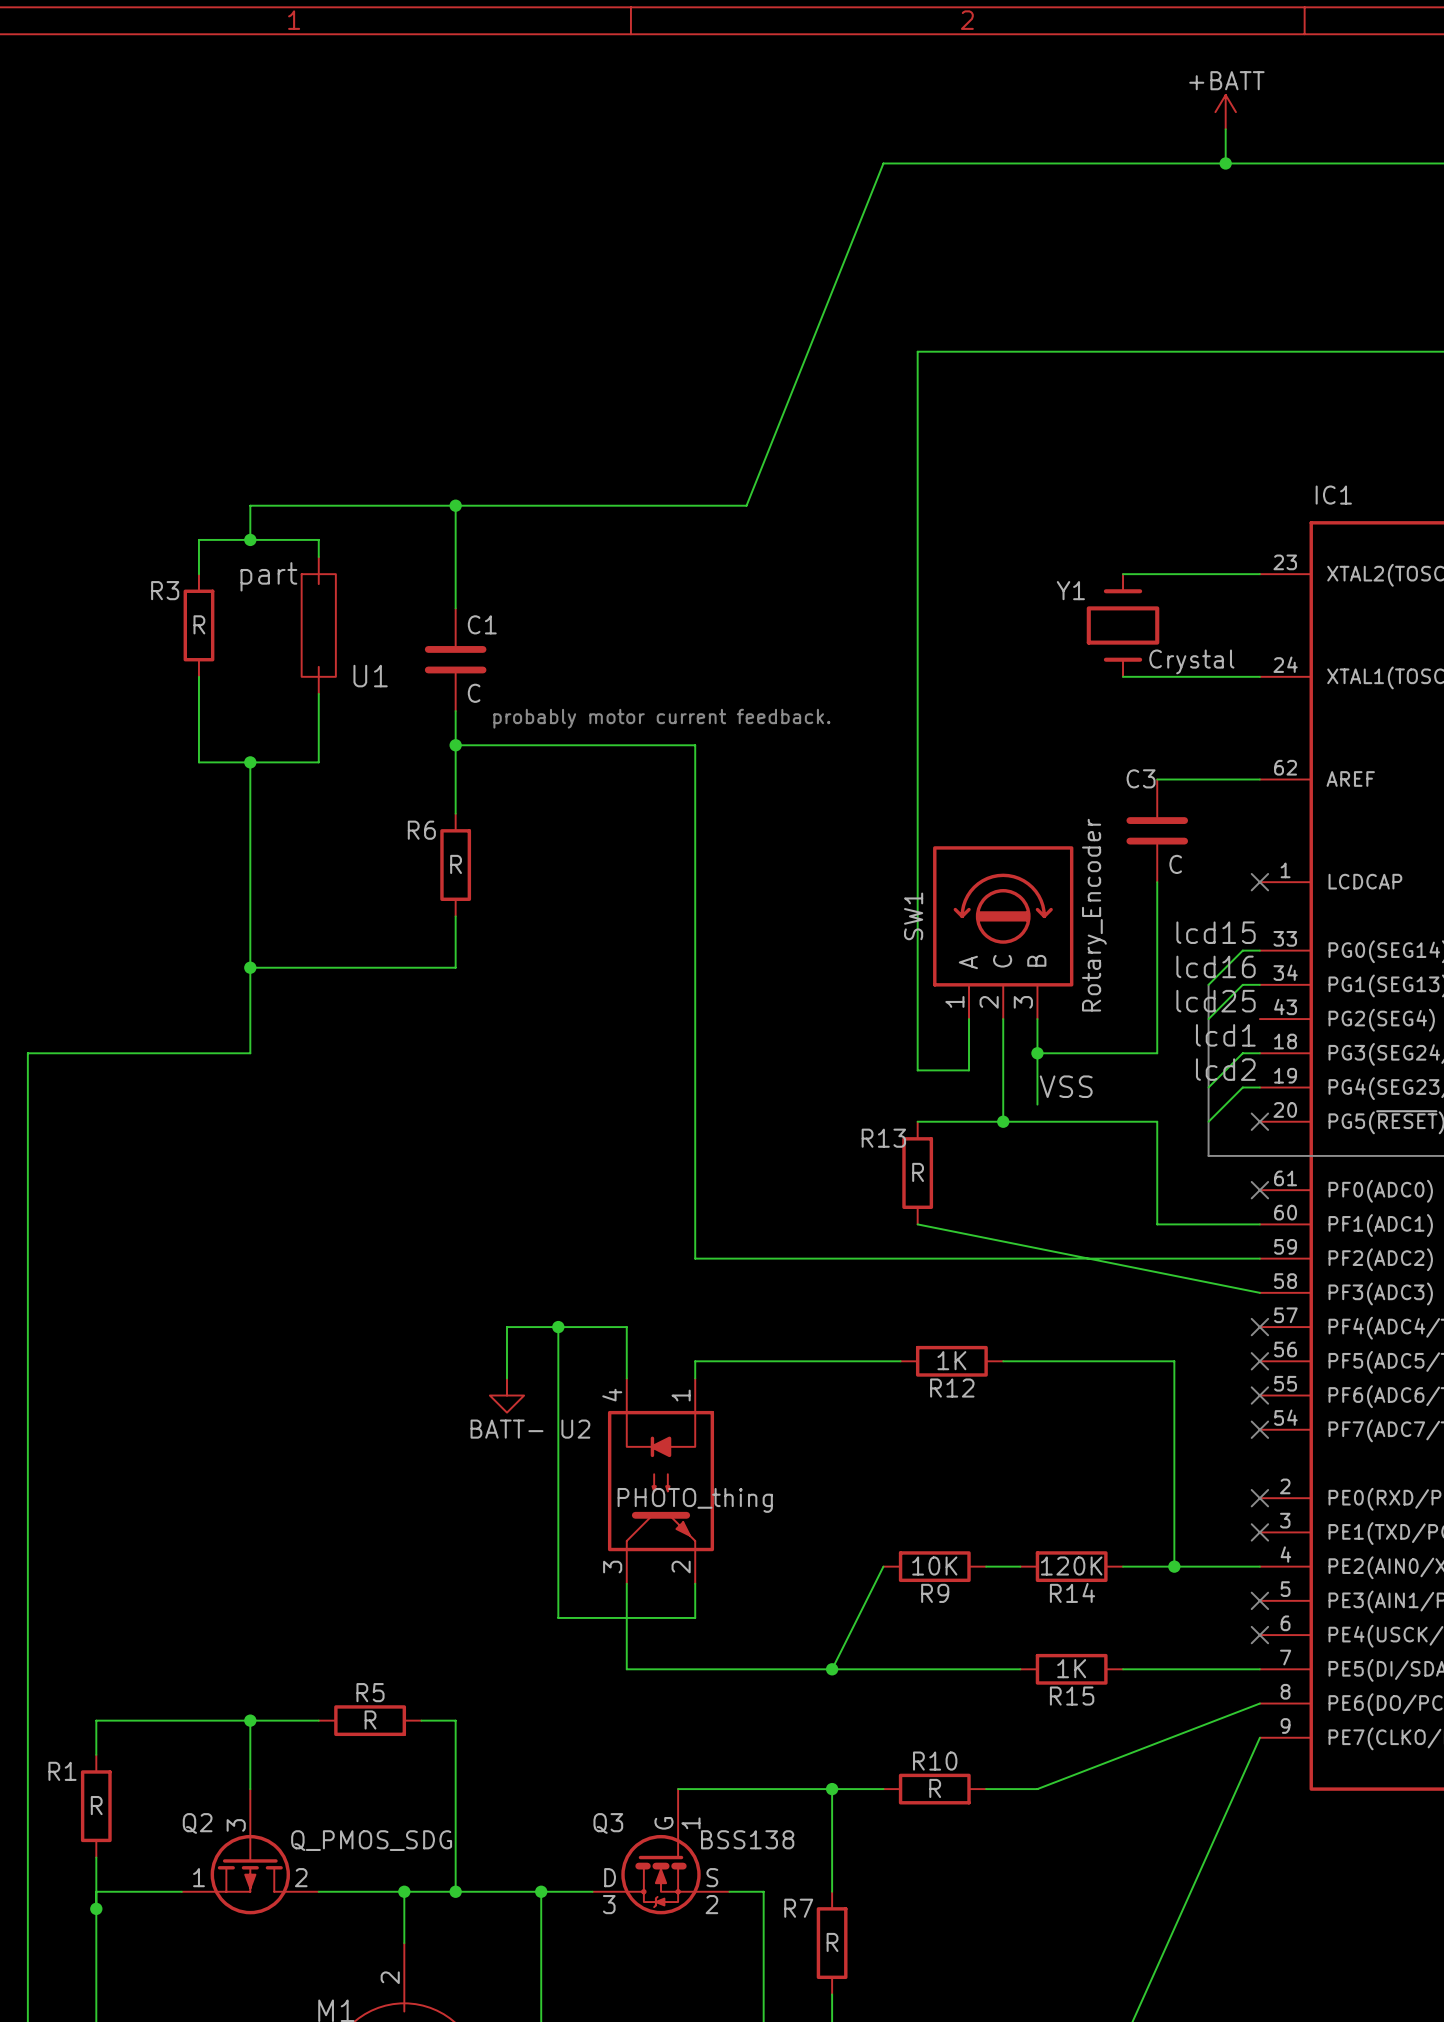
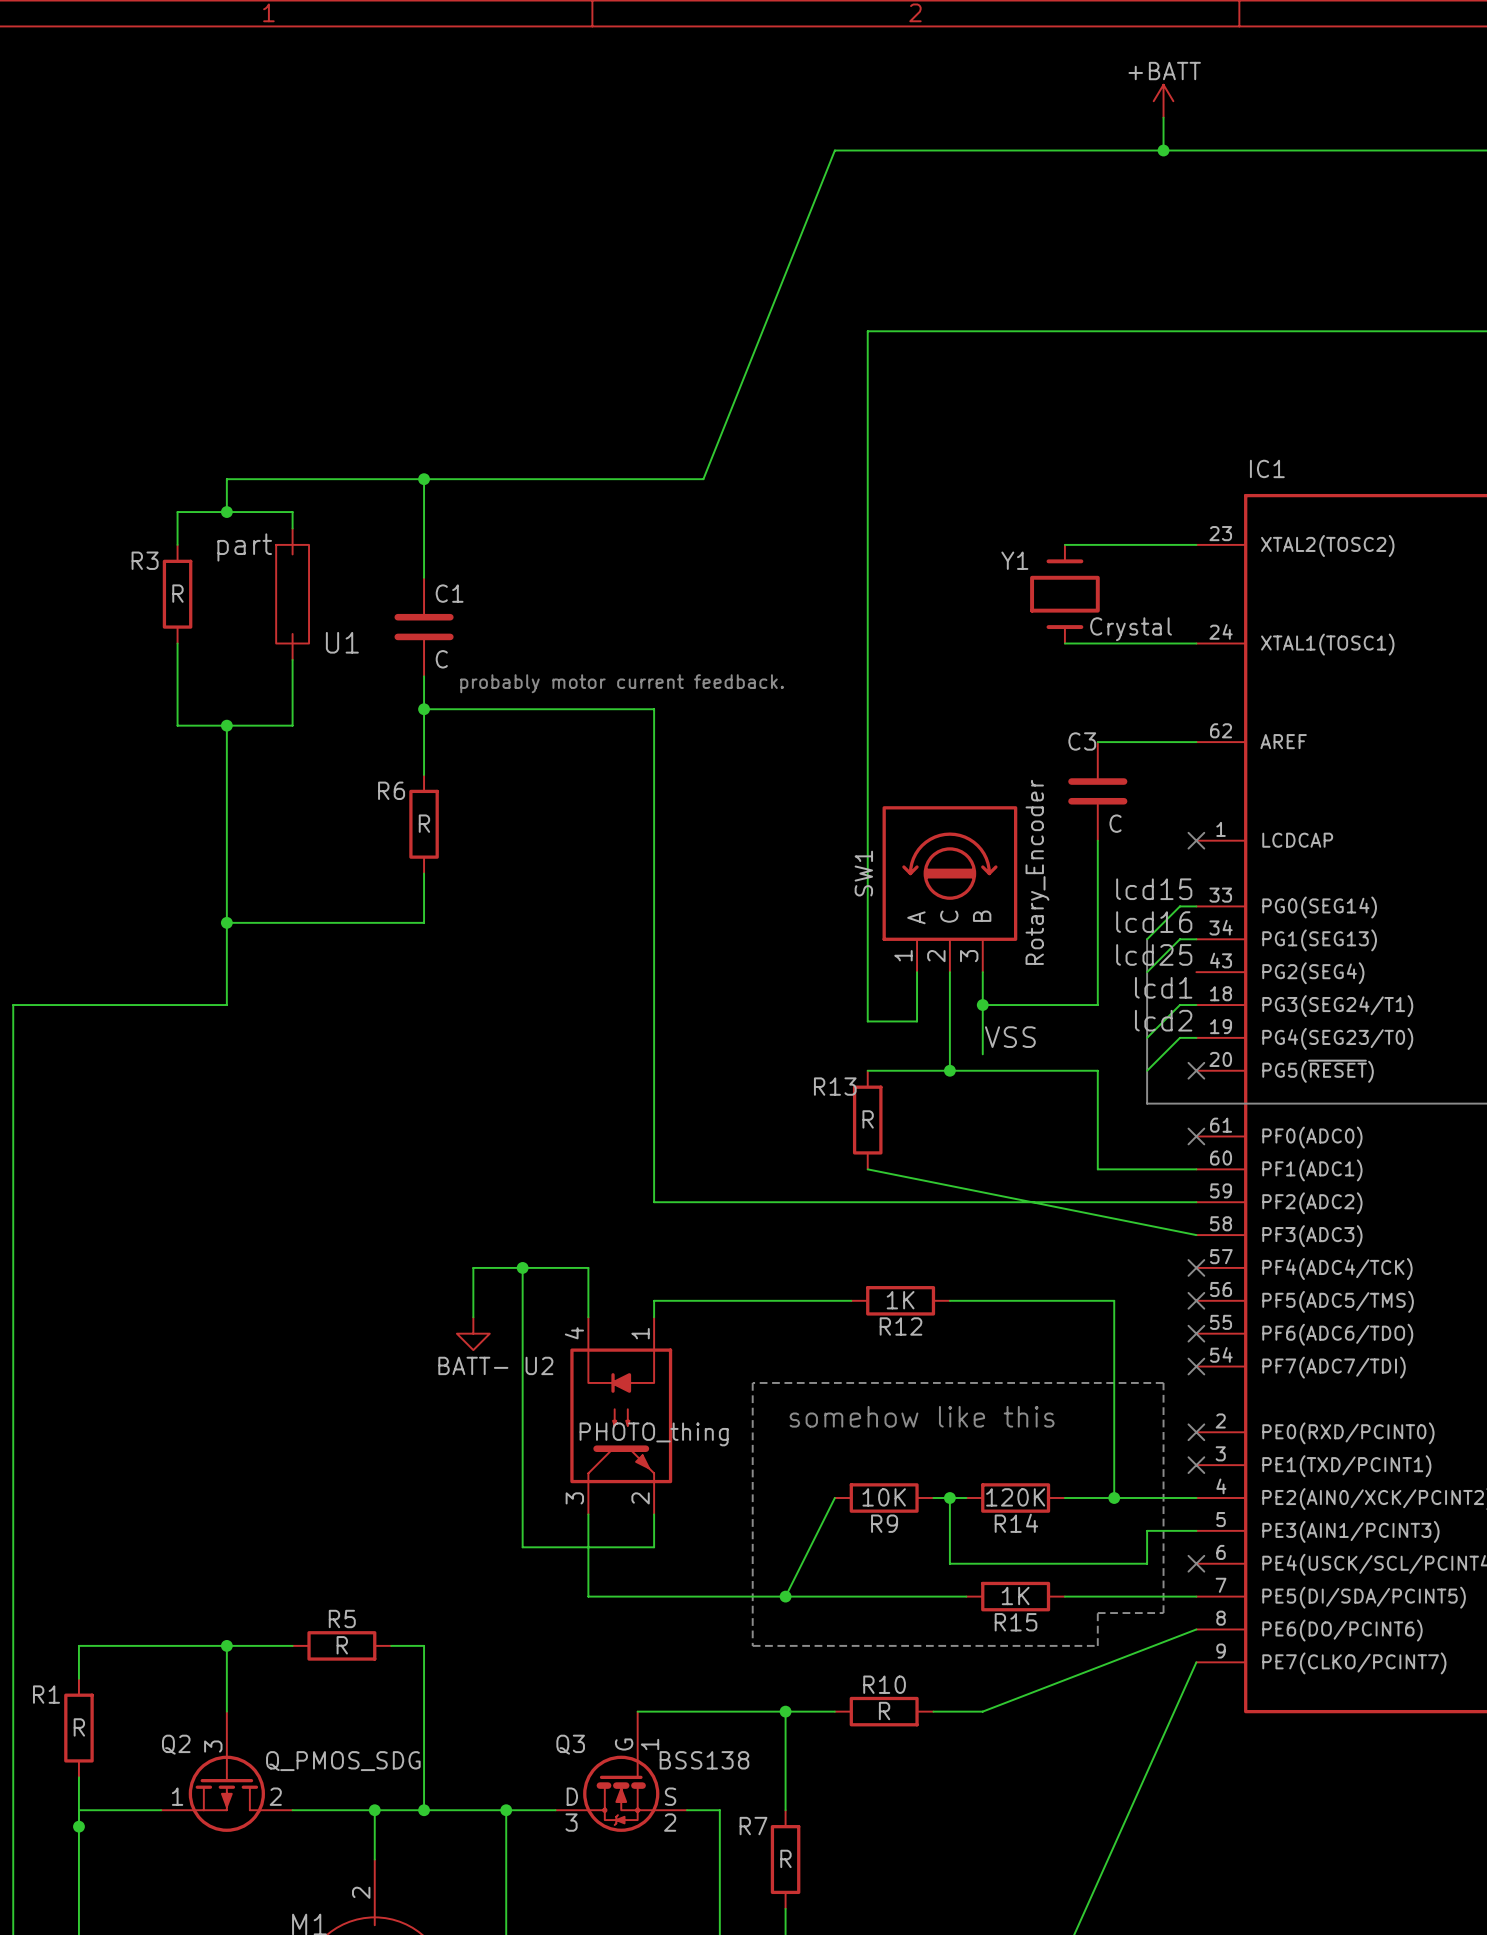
line: none -> (752, 1382) (752, 1645) (1097, 1645) (1097, 1613) (1163, 1613) (1163, 1382) (752, 1382)
text: none -> somehow like this (922, 1416)
wire: none -> (949, 1498) (949, 1563) (1147, 1563) (1147, 1530) (1196, 1530)
junction: none -> (949, 1498)
no-connect mark: (1259, 1600) -> none

